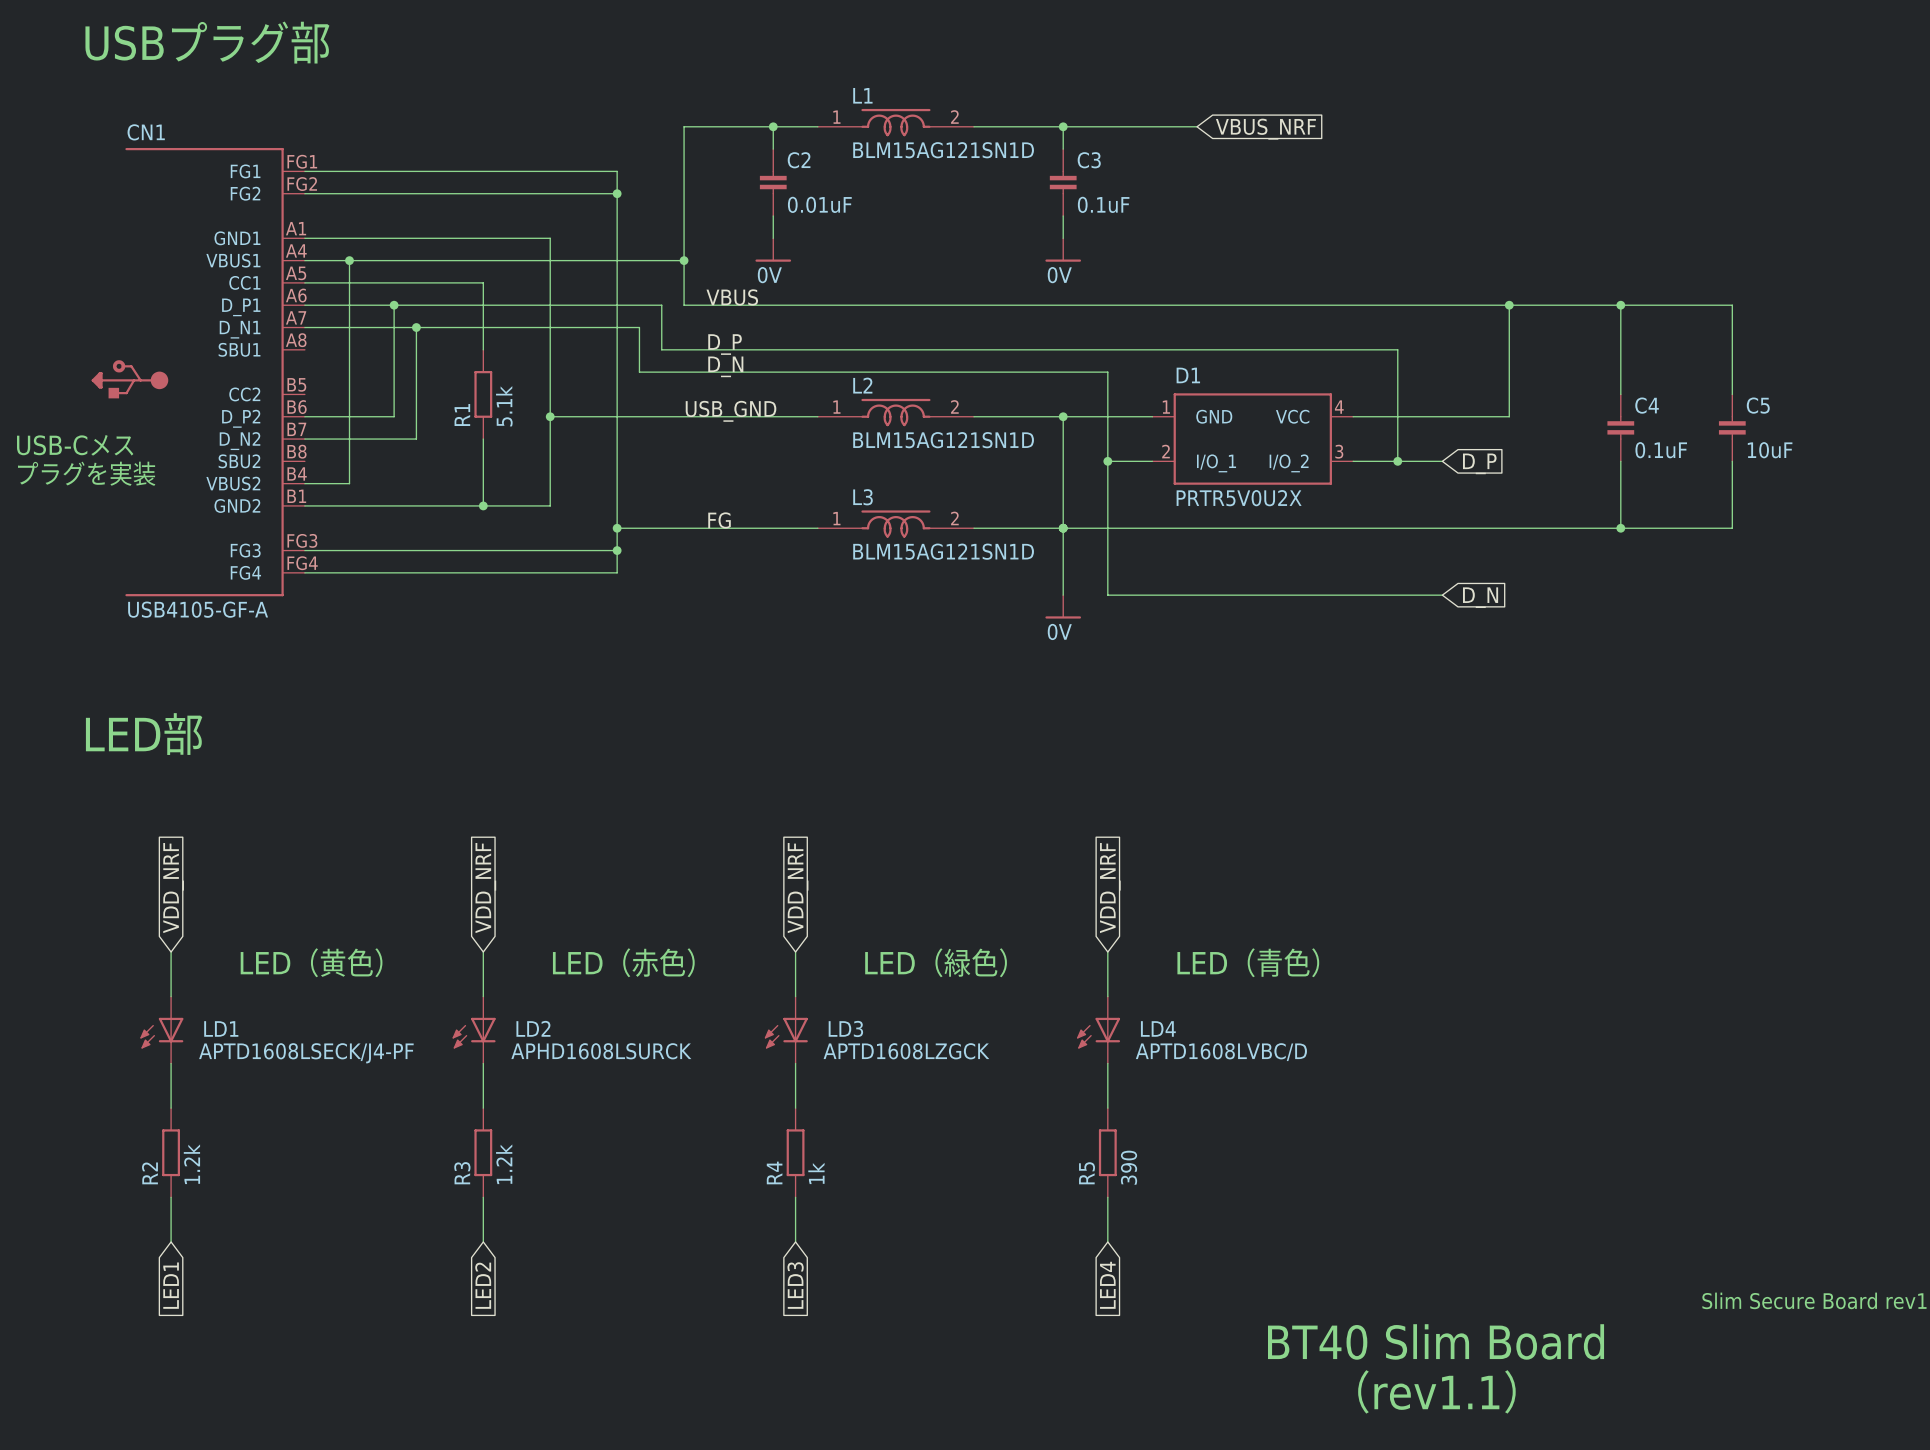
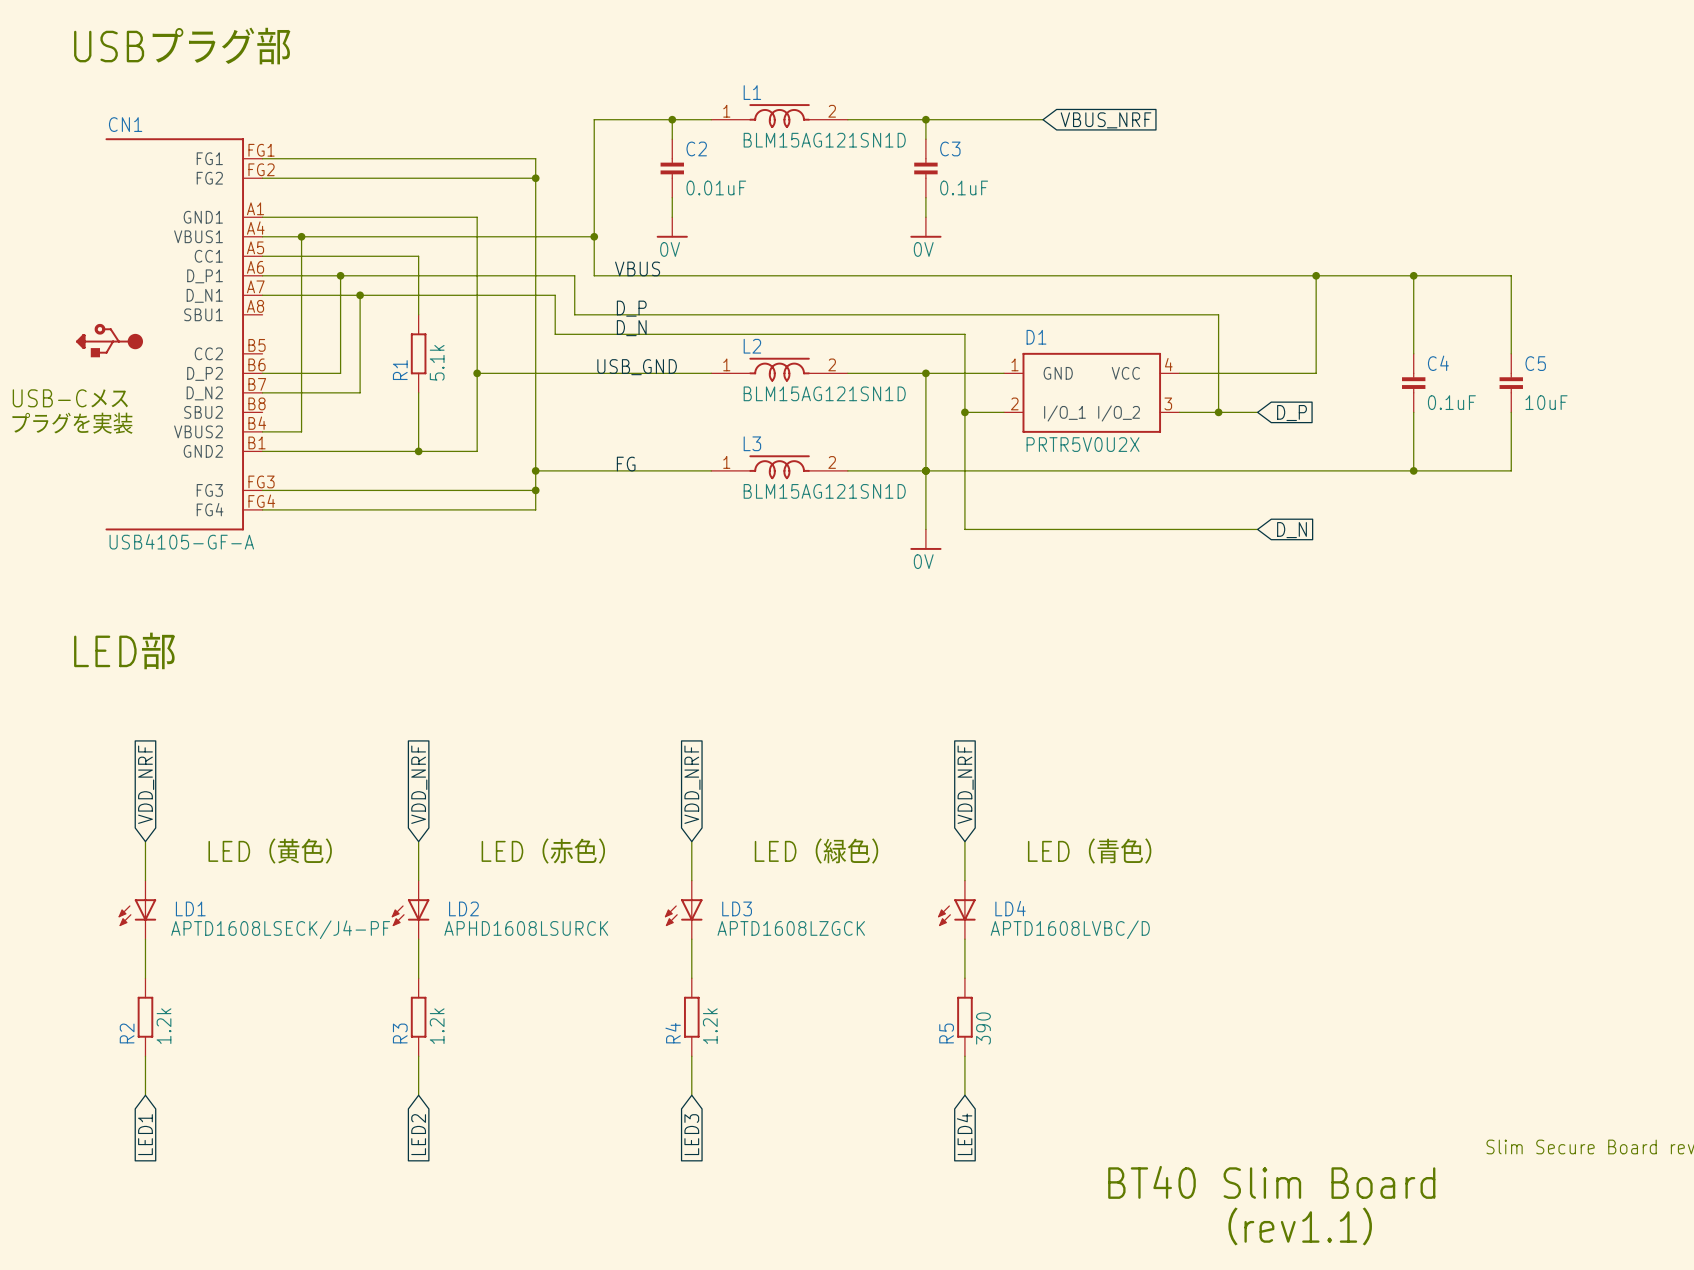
R4 value: 1k (816, 1173) -> 1.2k (710, 1026)

